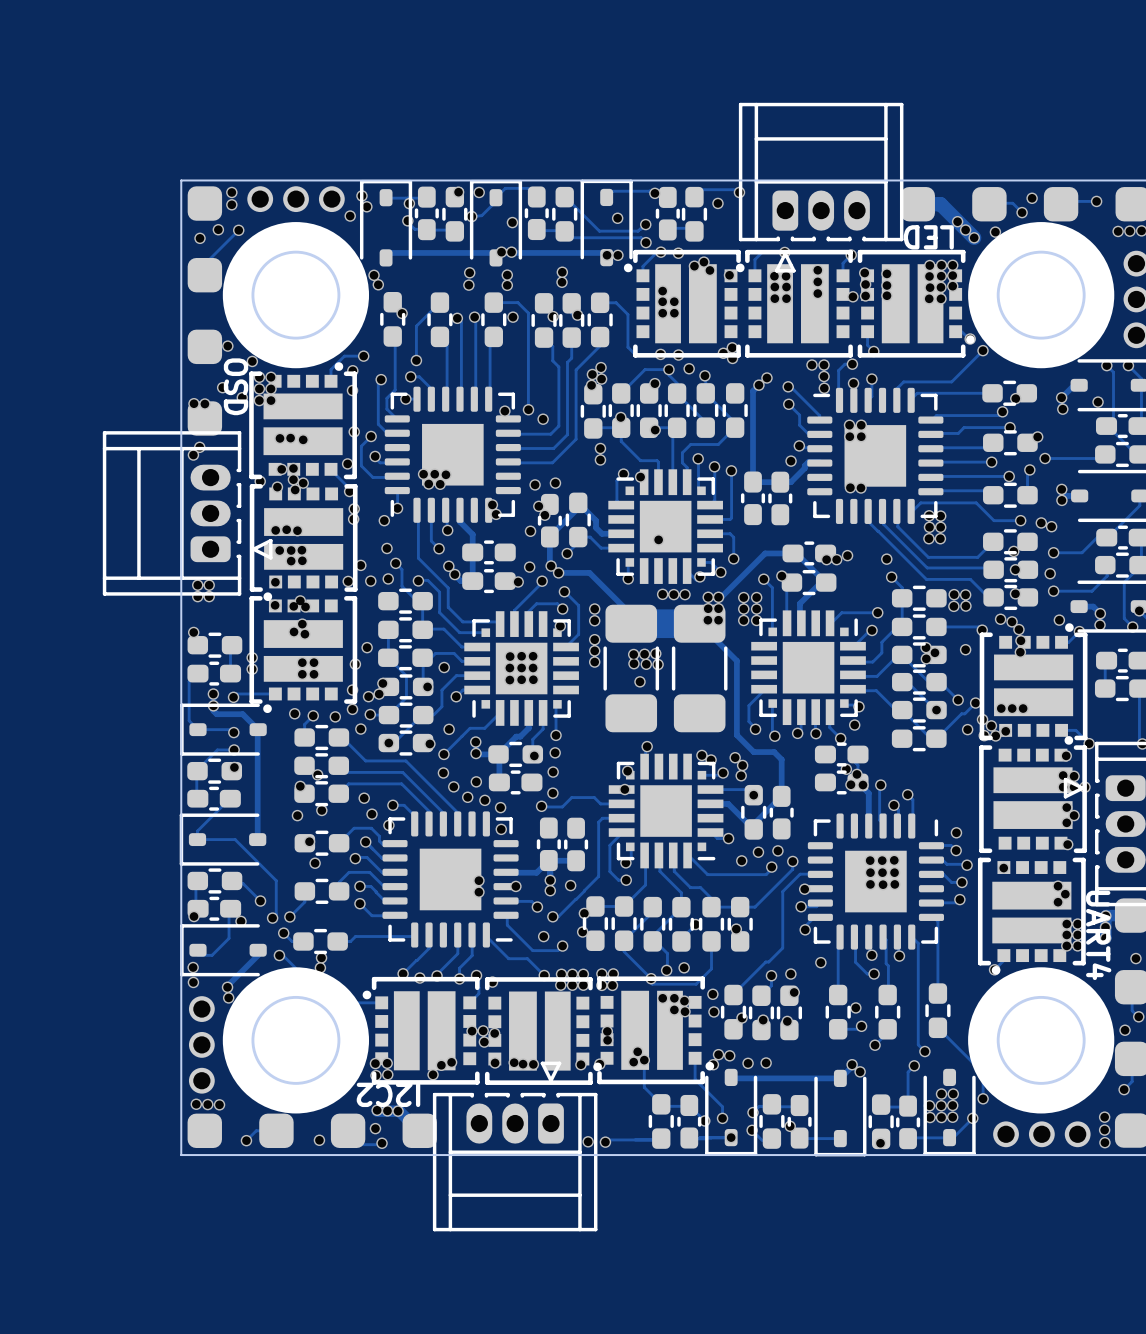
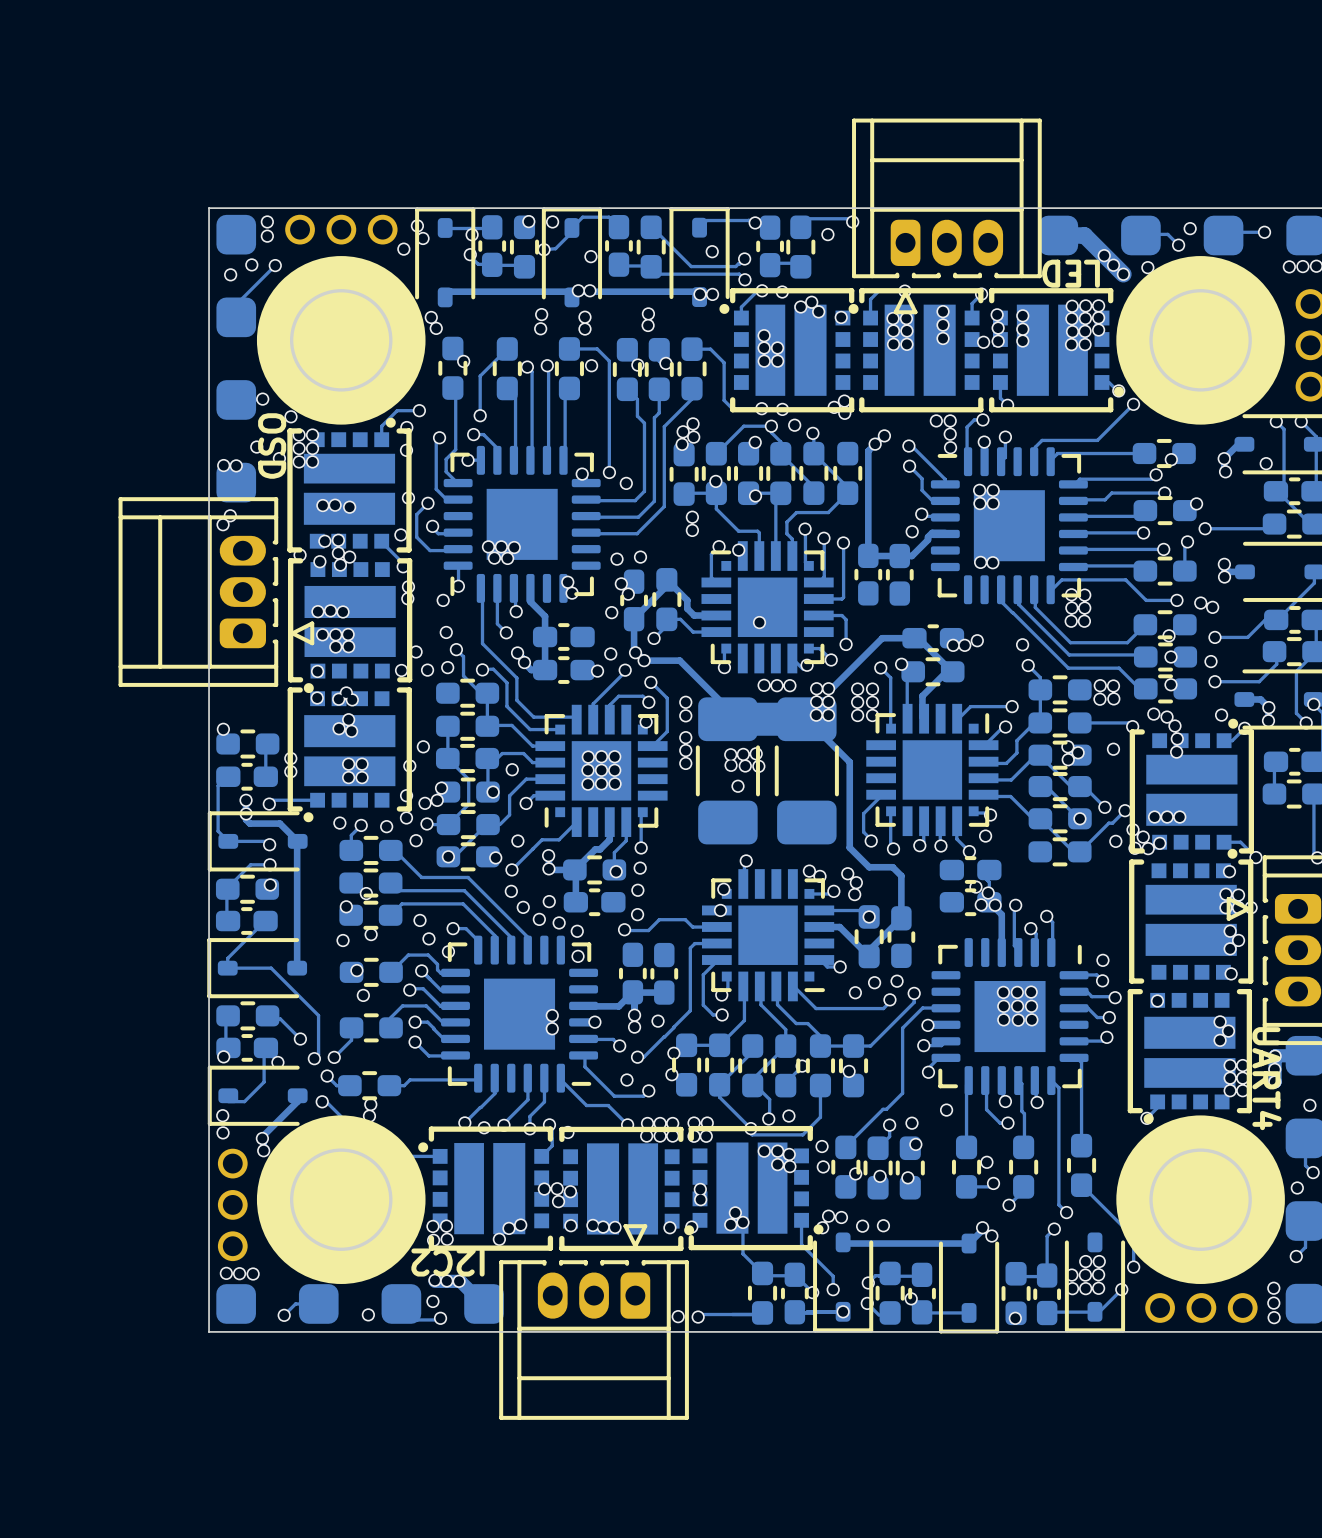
via: (197, 585) -> none
via: (209, 585) -> none
via: (197, 596) -> none
via: (209, 596) -> none

